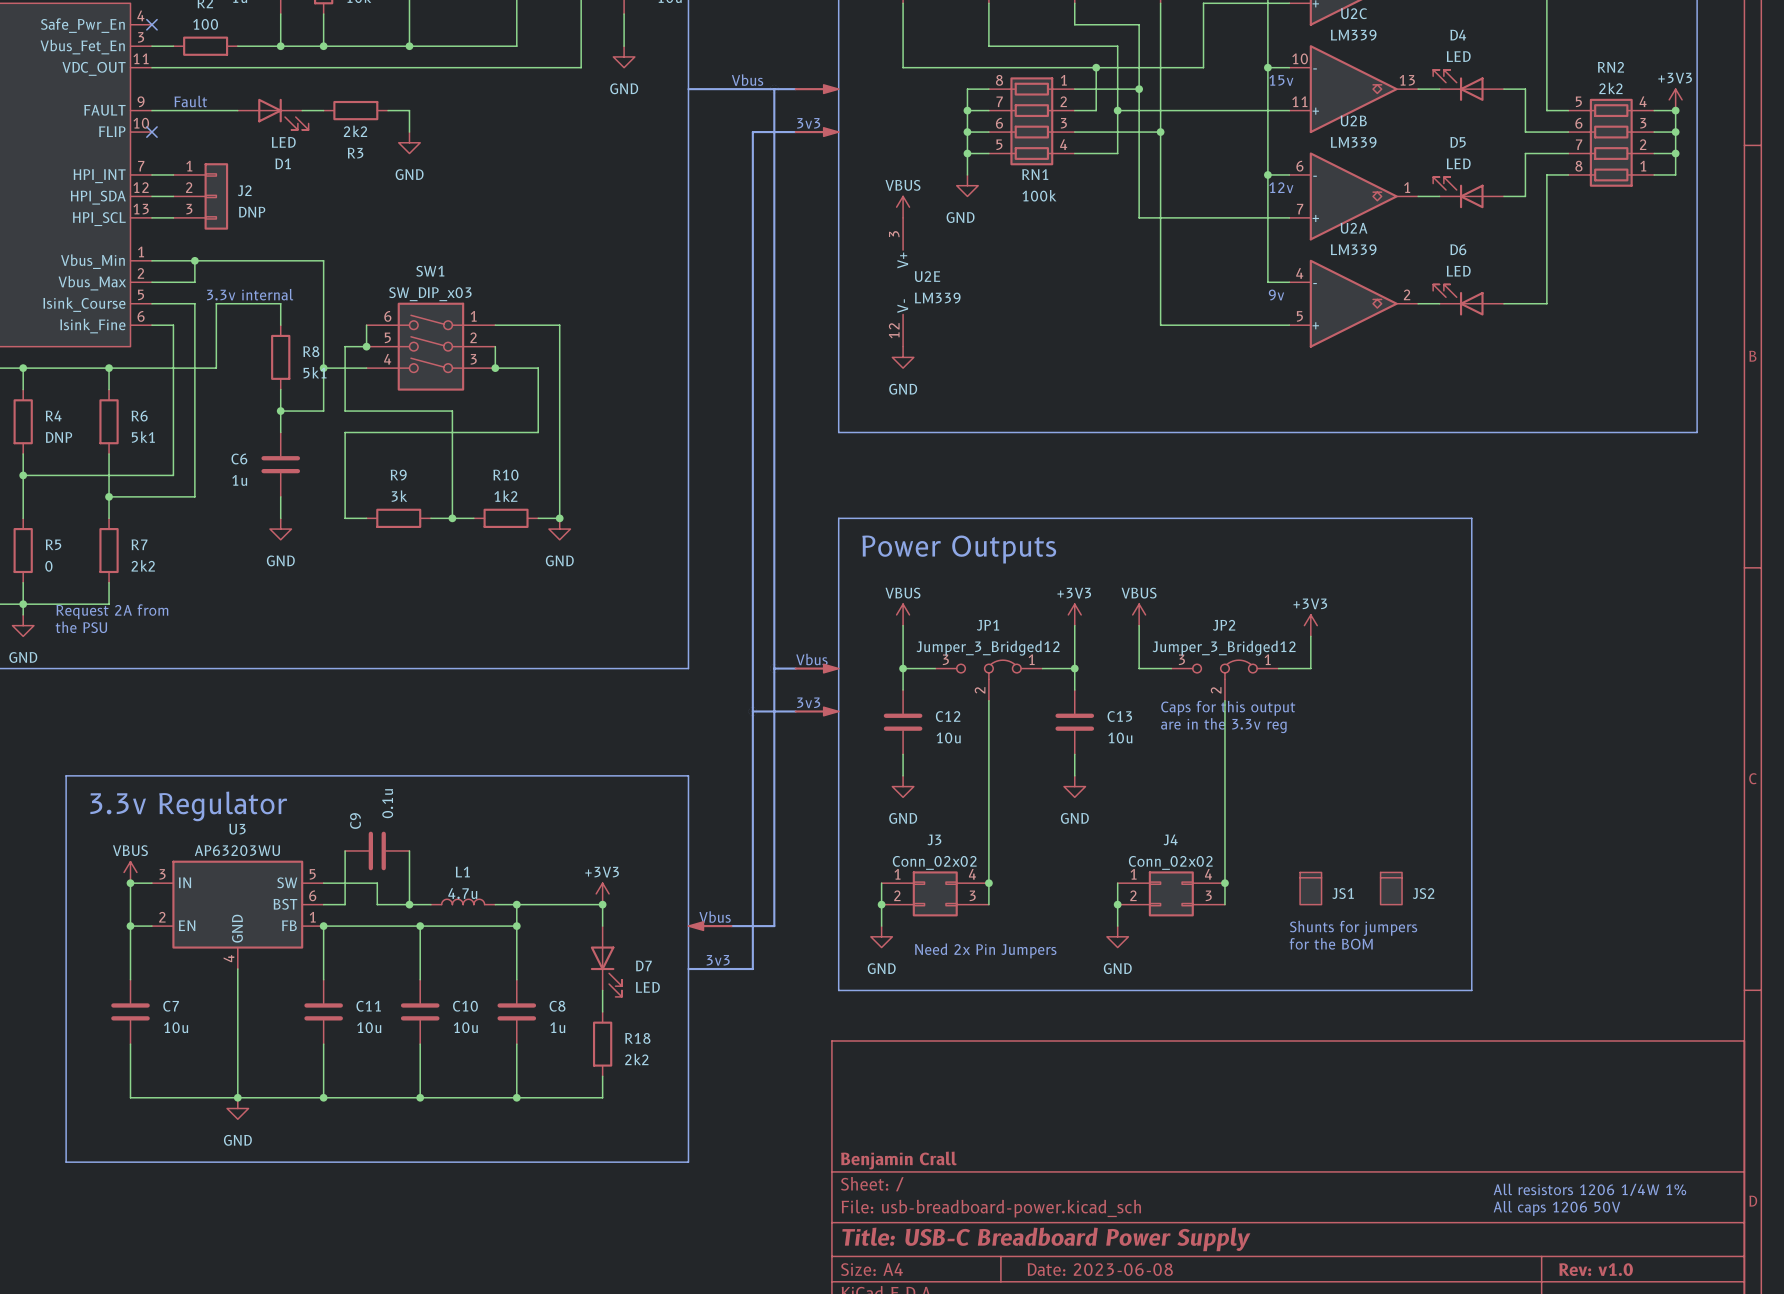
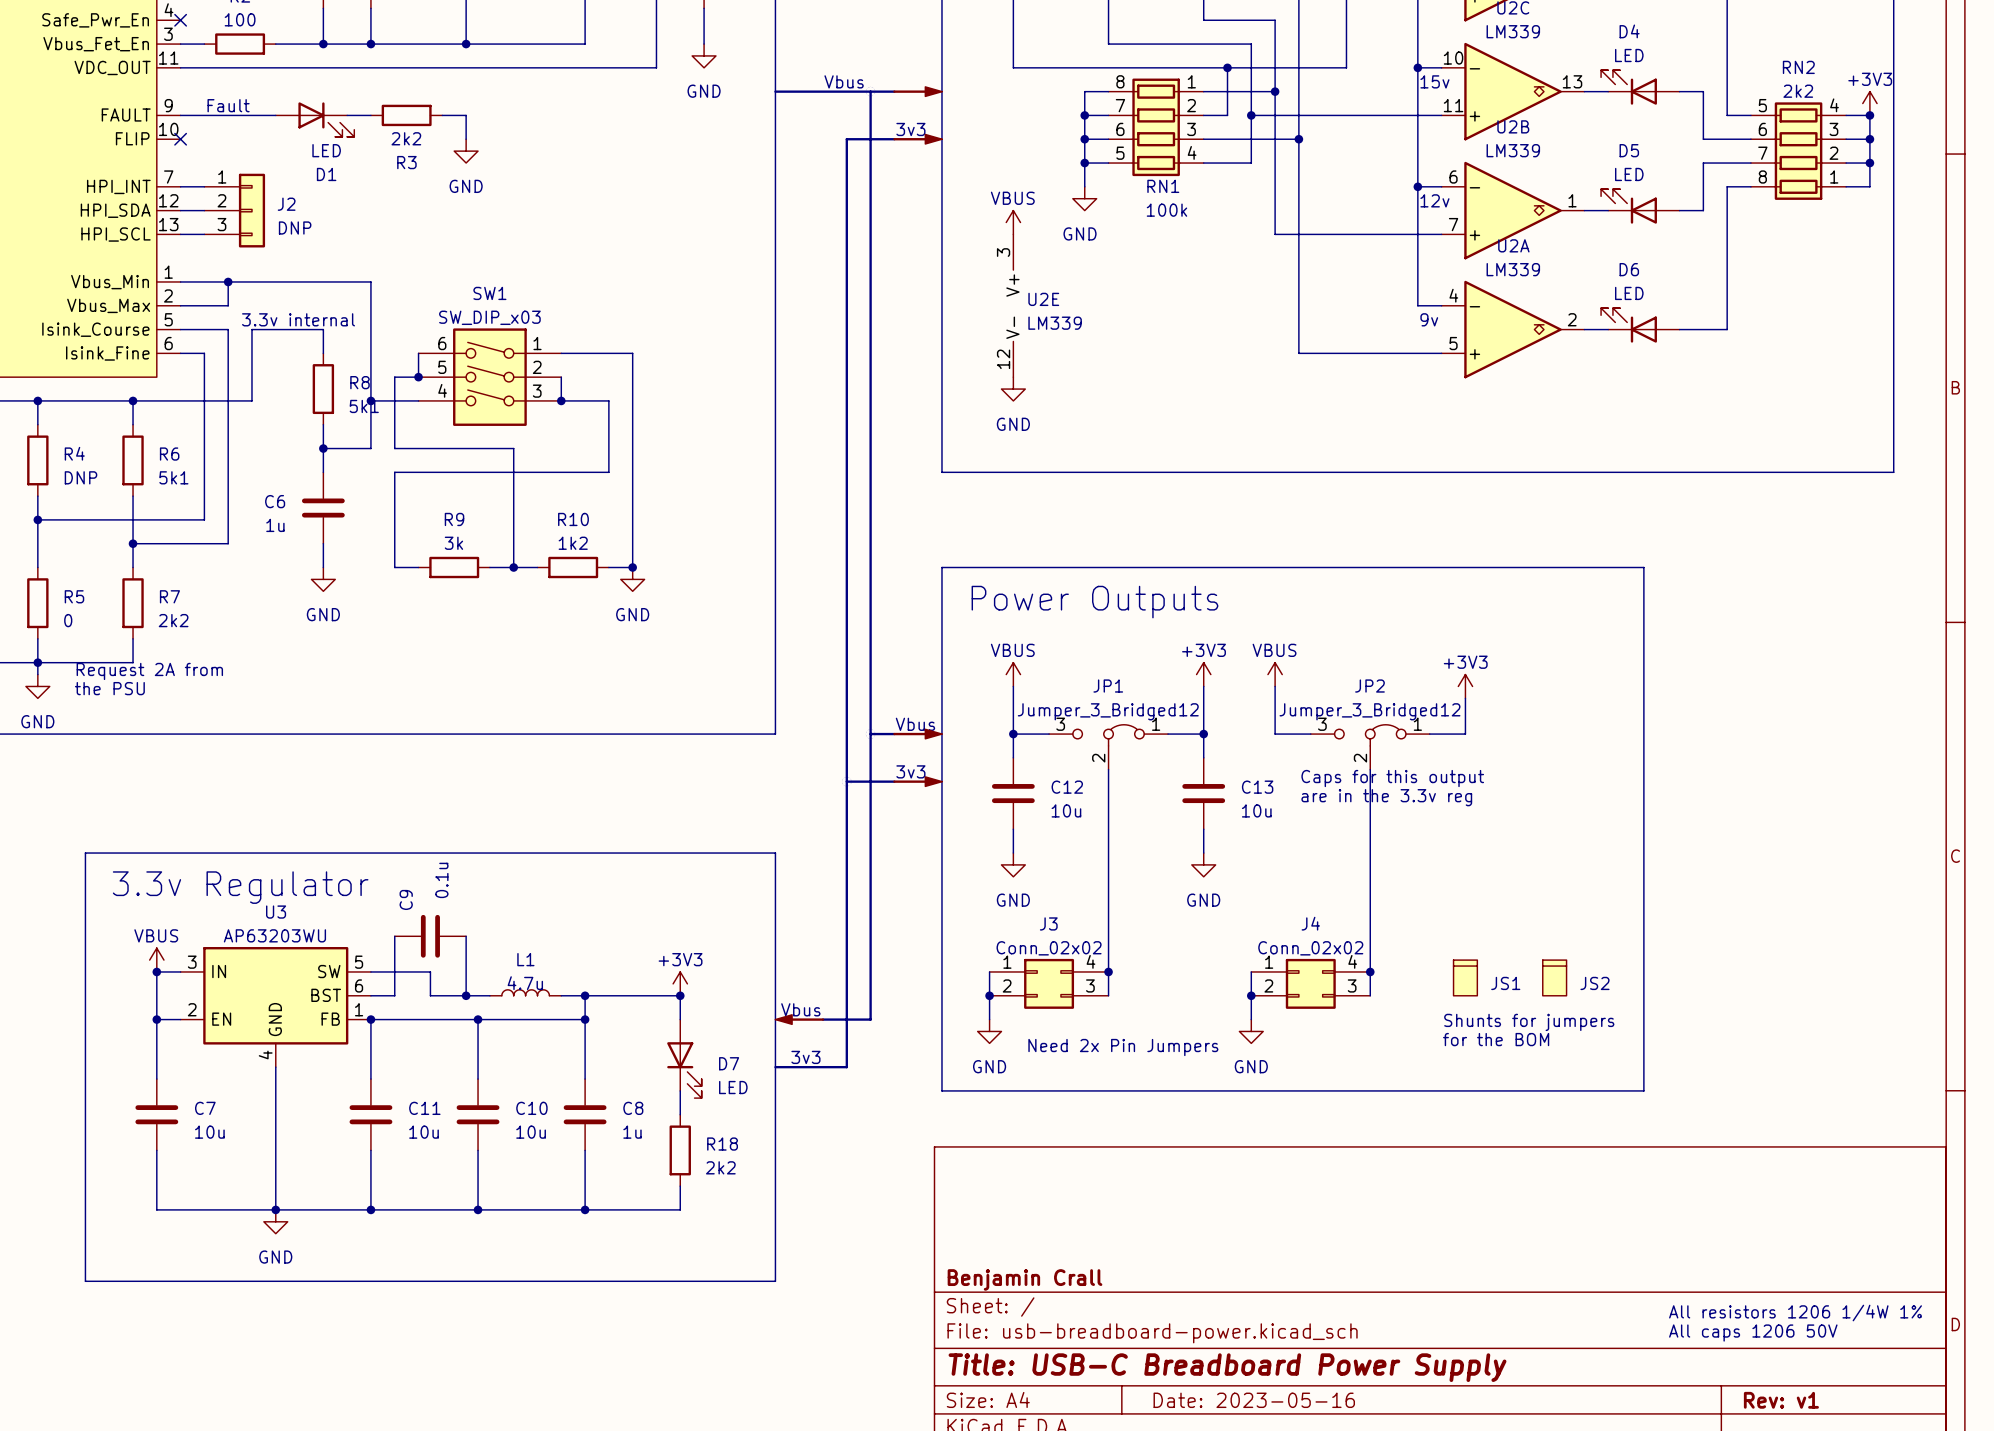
title block: Date: 2023-06-08 (1100, 1269) -> Date: 2023-05-16 (1254, 1400)
title block: Rev: v1.0 (1596, 1269) -> Rev: v1 (1781, 1400)

